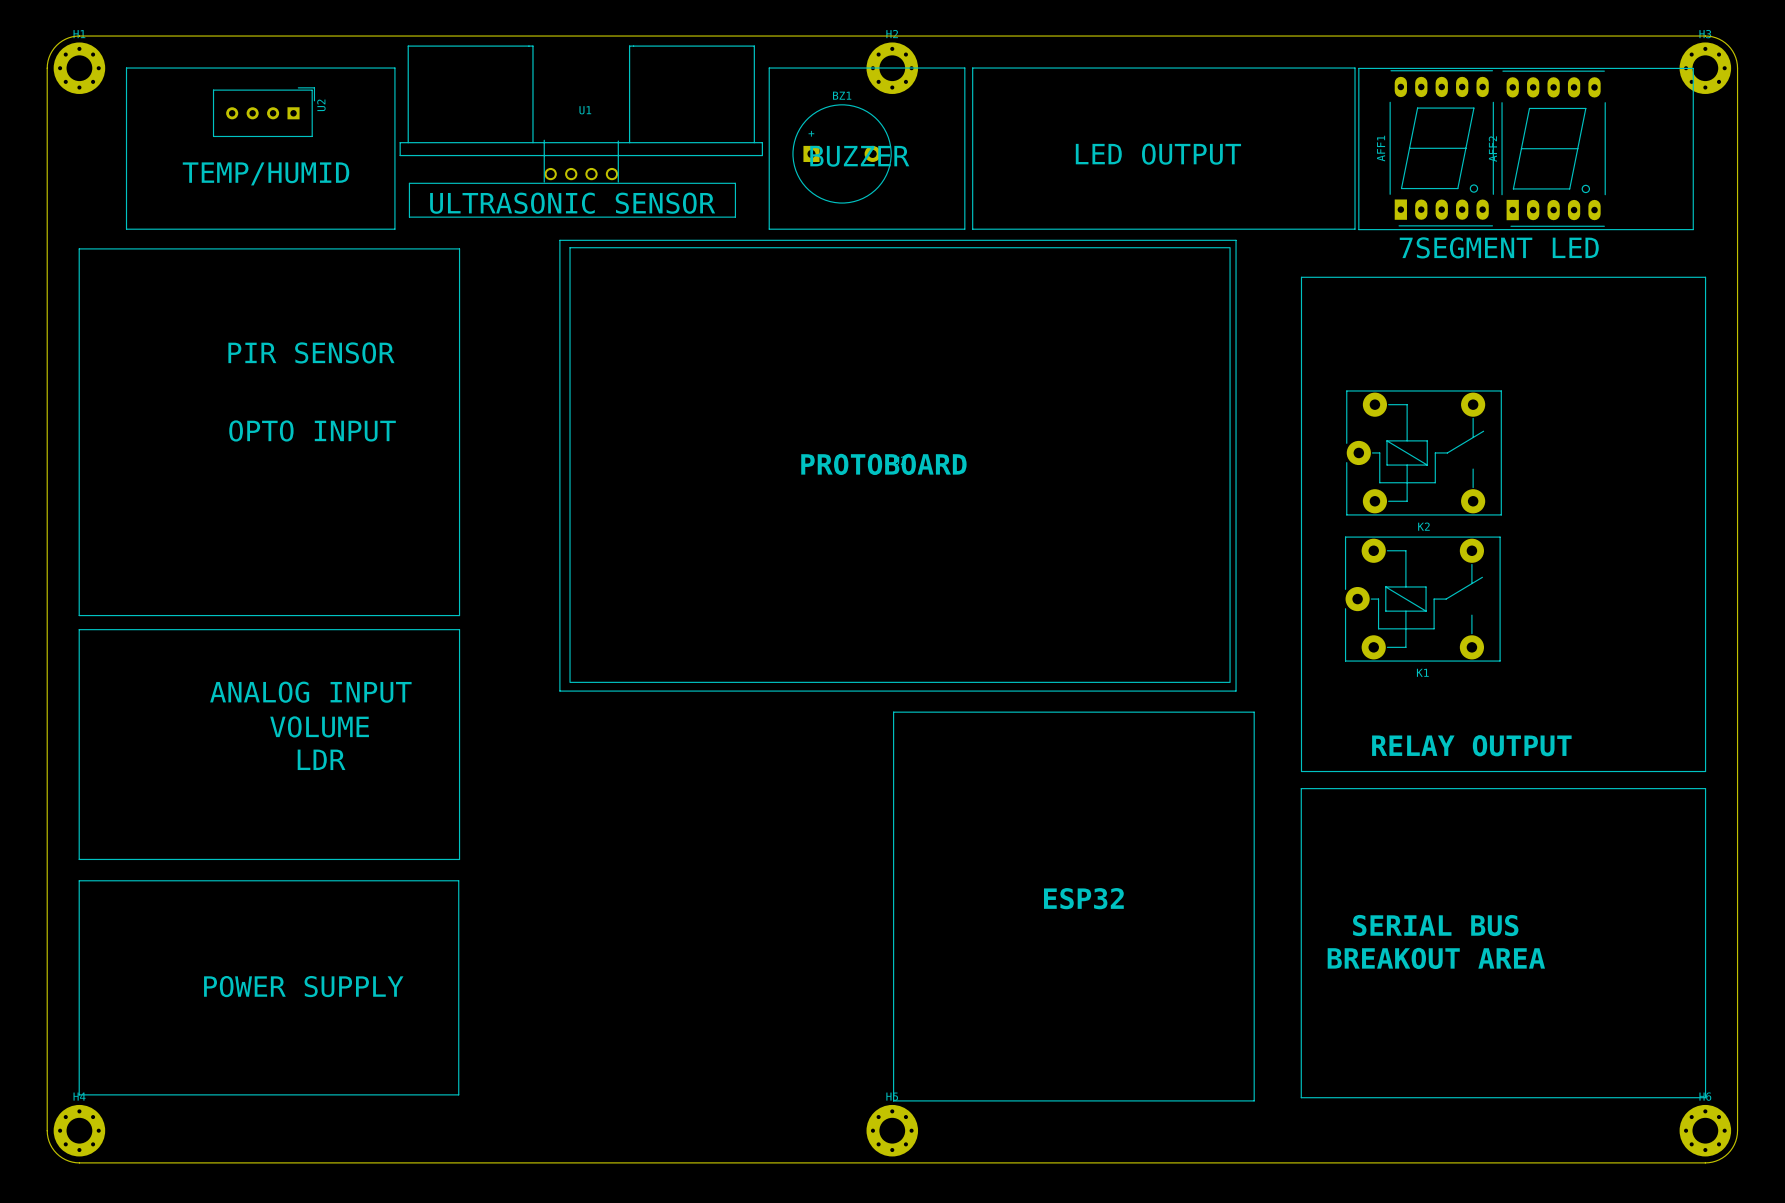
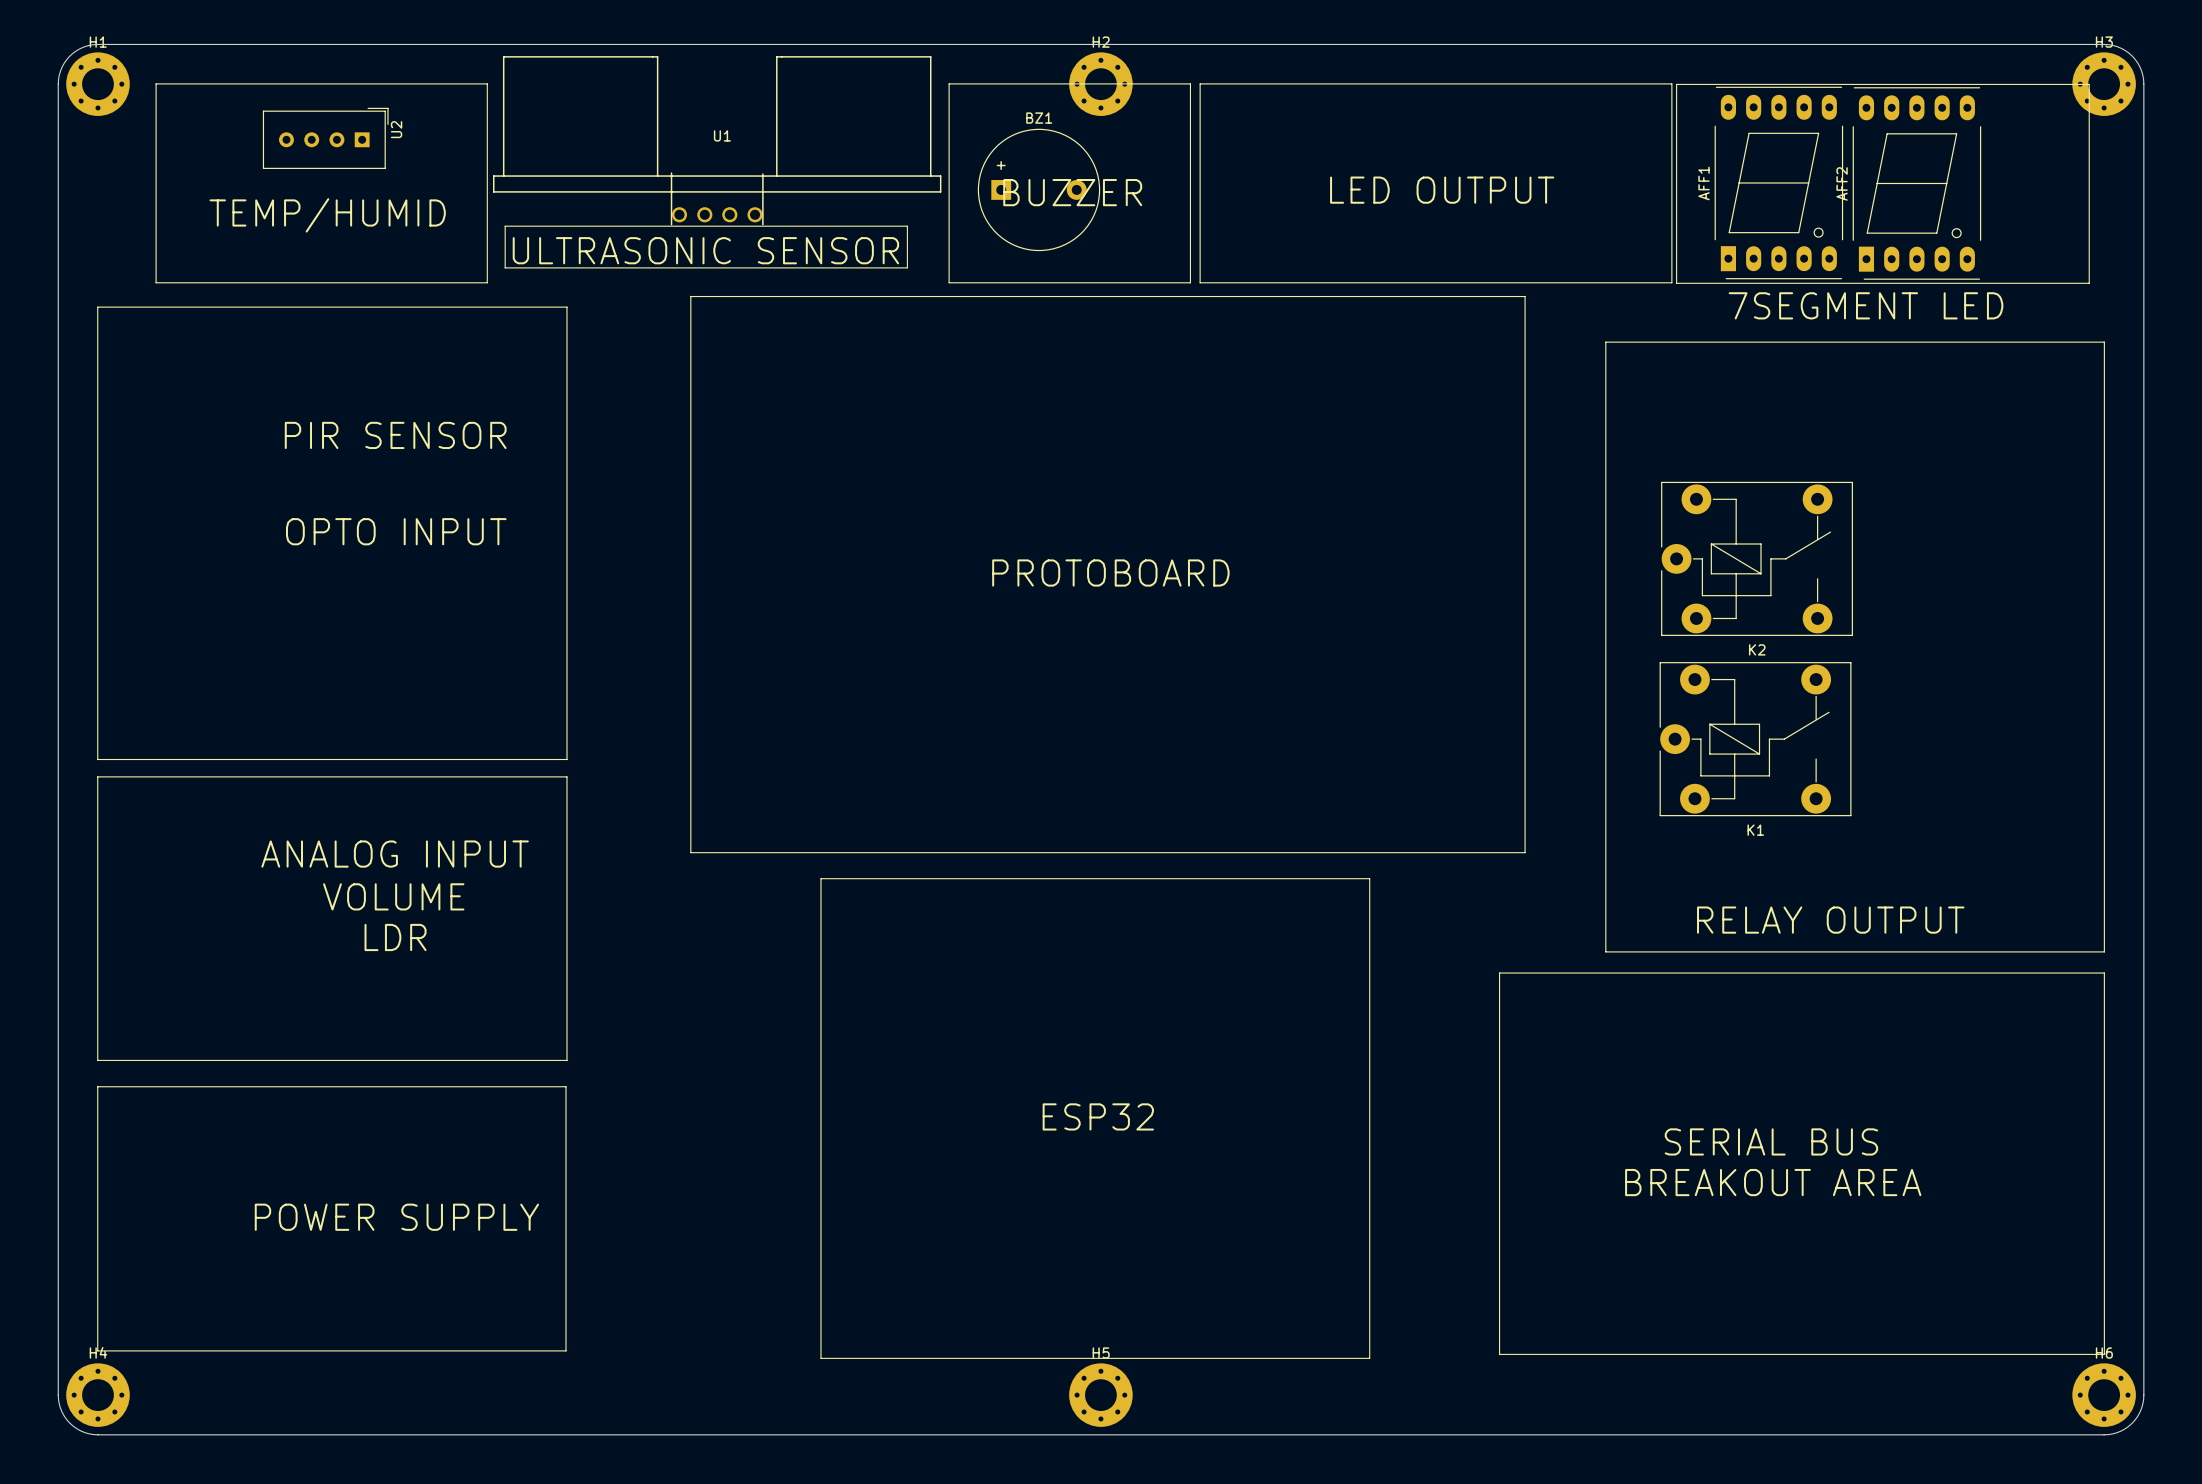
part: (900, 465) -> none
line: (893, 712) (893, 1100) -> (1102, 878) (820, 878) (820, 1358) (1102, 1358)
line: (1110, 712) (1254, 712) (1254, 1100) (1110, 1100) -> (1369, 878) (1369, 1358)
line: (1301, 788) (1301, 1097) -> (1605, 973) (1499, 973) (1499, 1354) (1605, 1354)
text: ESP32 (1083, 898) -> none
text: none -> ESP32 (1098, 1116)

